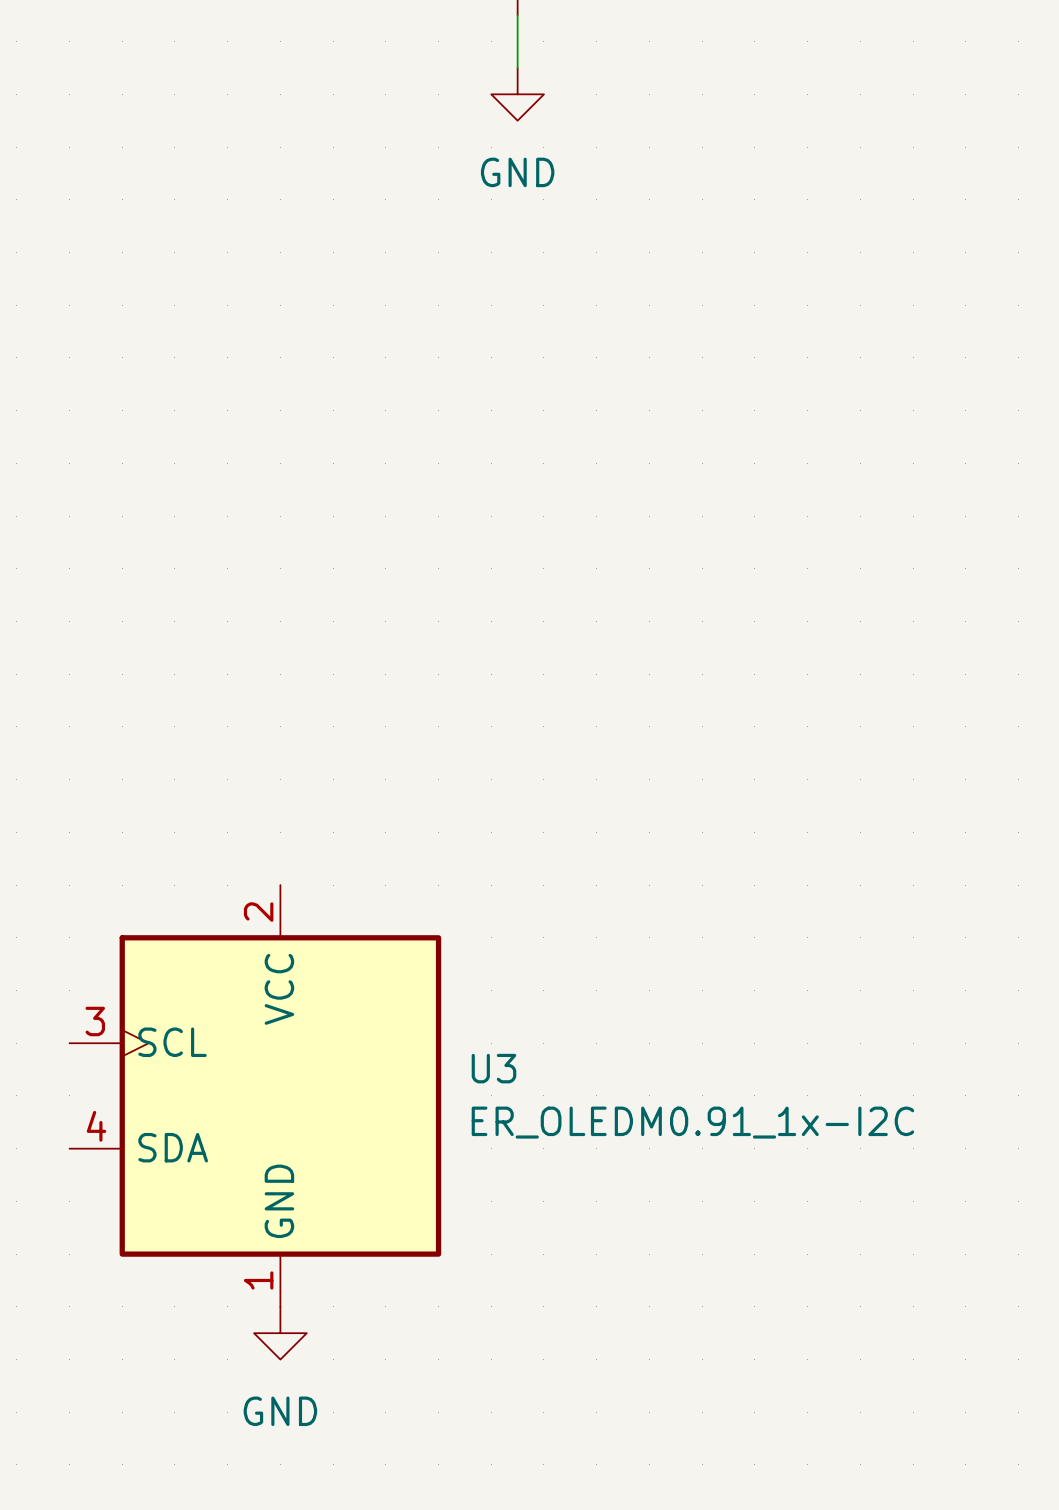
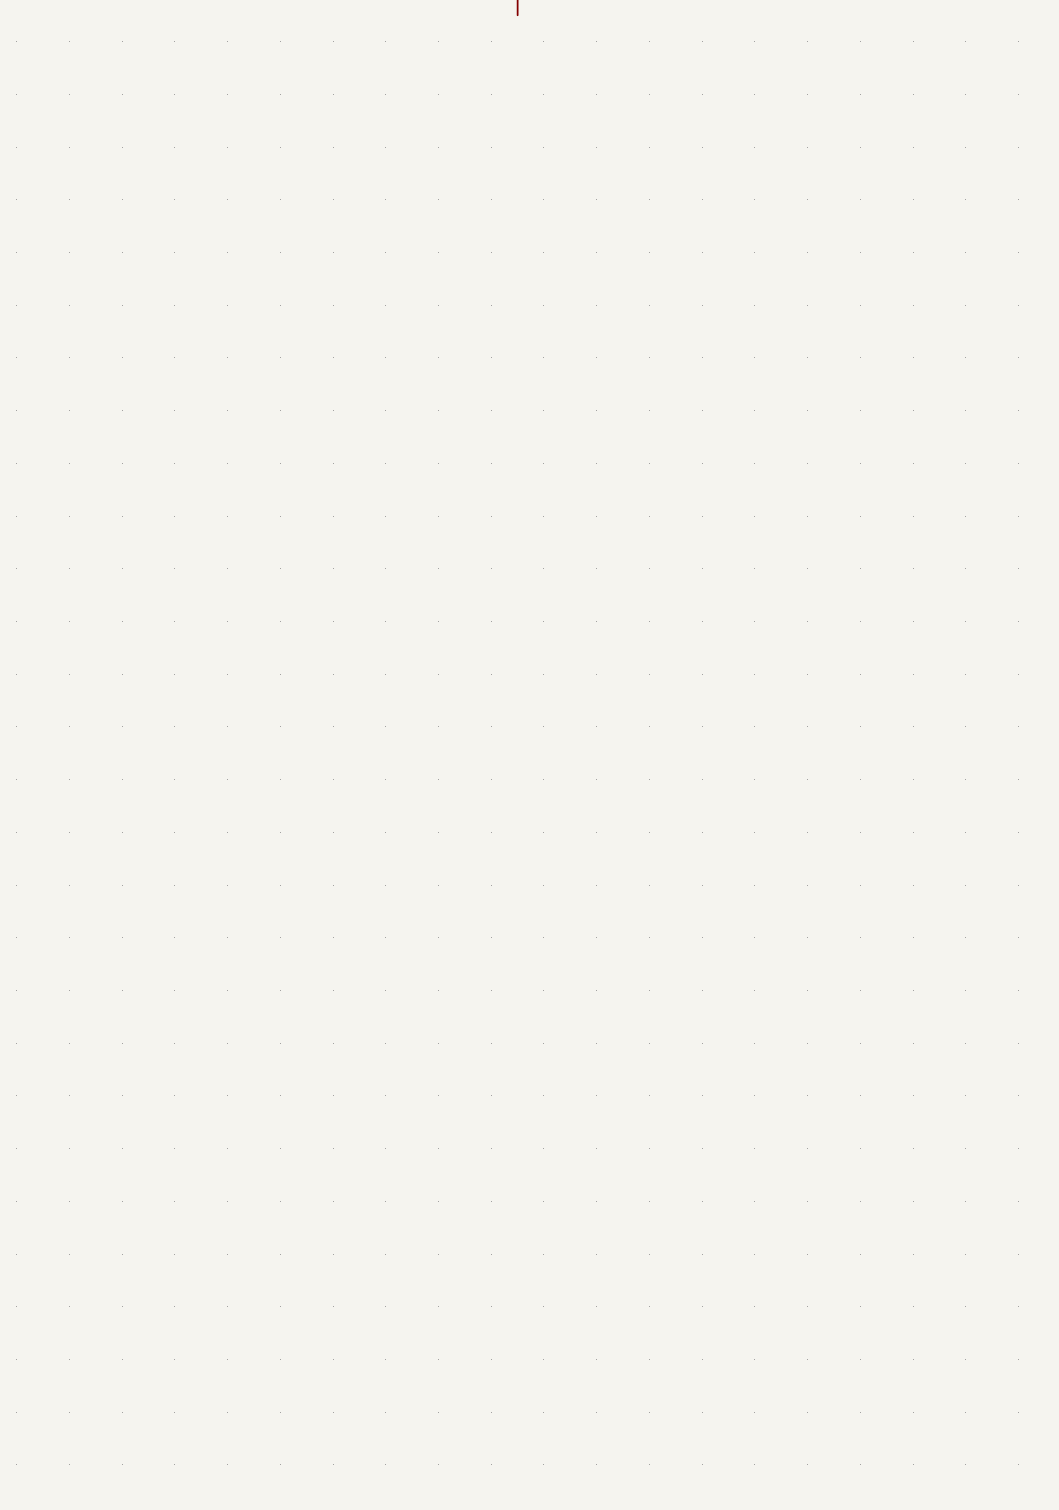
wire: (517, 15) (517, 67) -> none
power symbol: GND (517, 94) -> none
U3: ER_OLEDM0.91_1x-I2C (255, 1095) -> none
power symbol: GND (280, 1333) -> none

